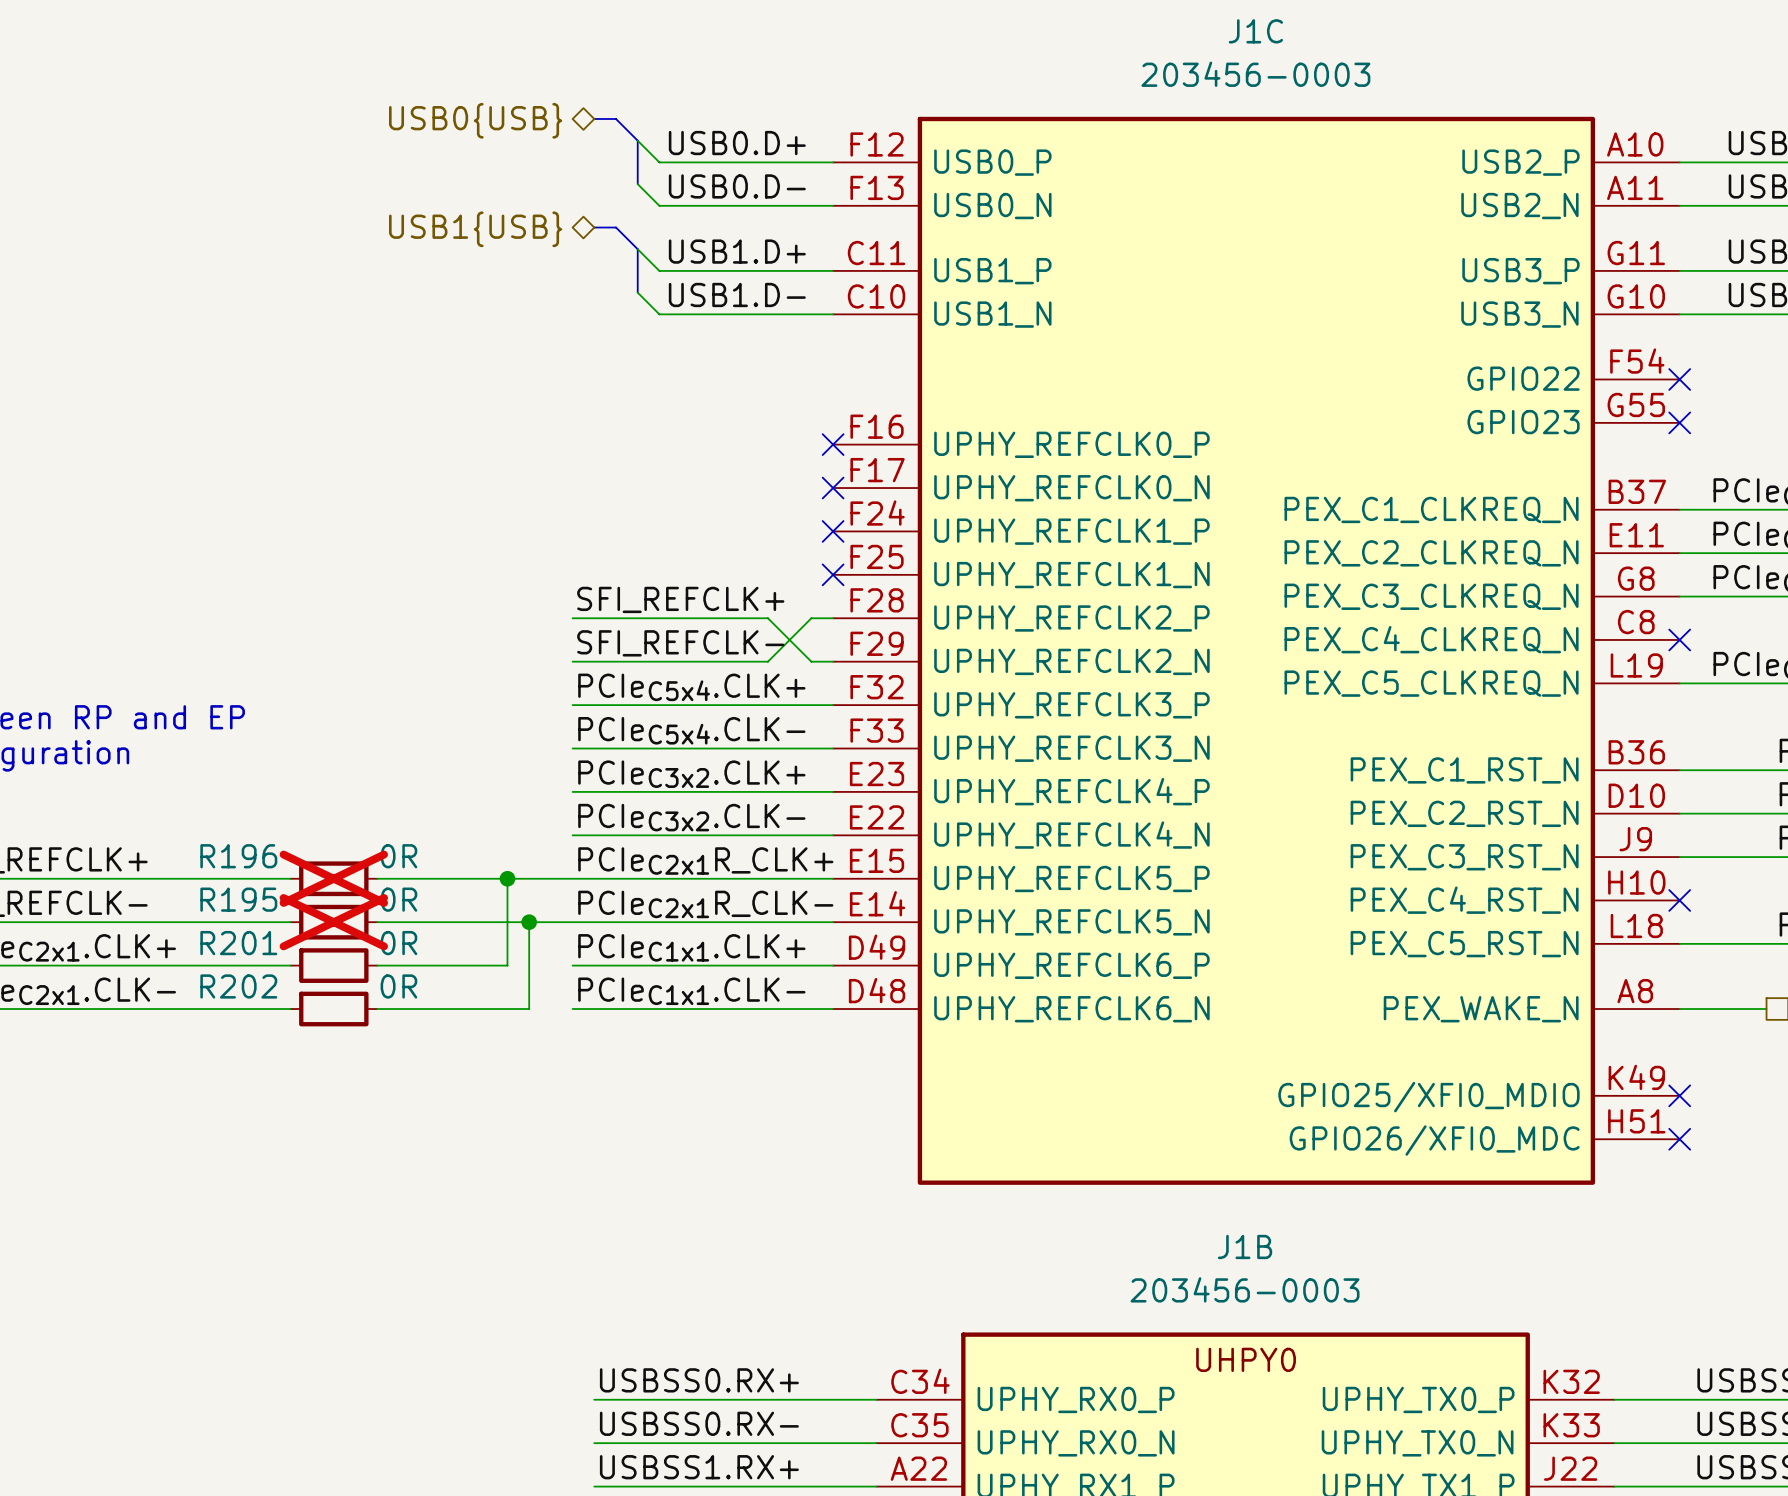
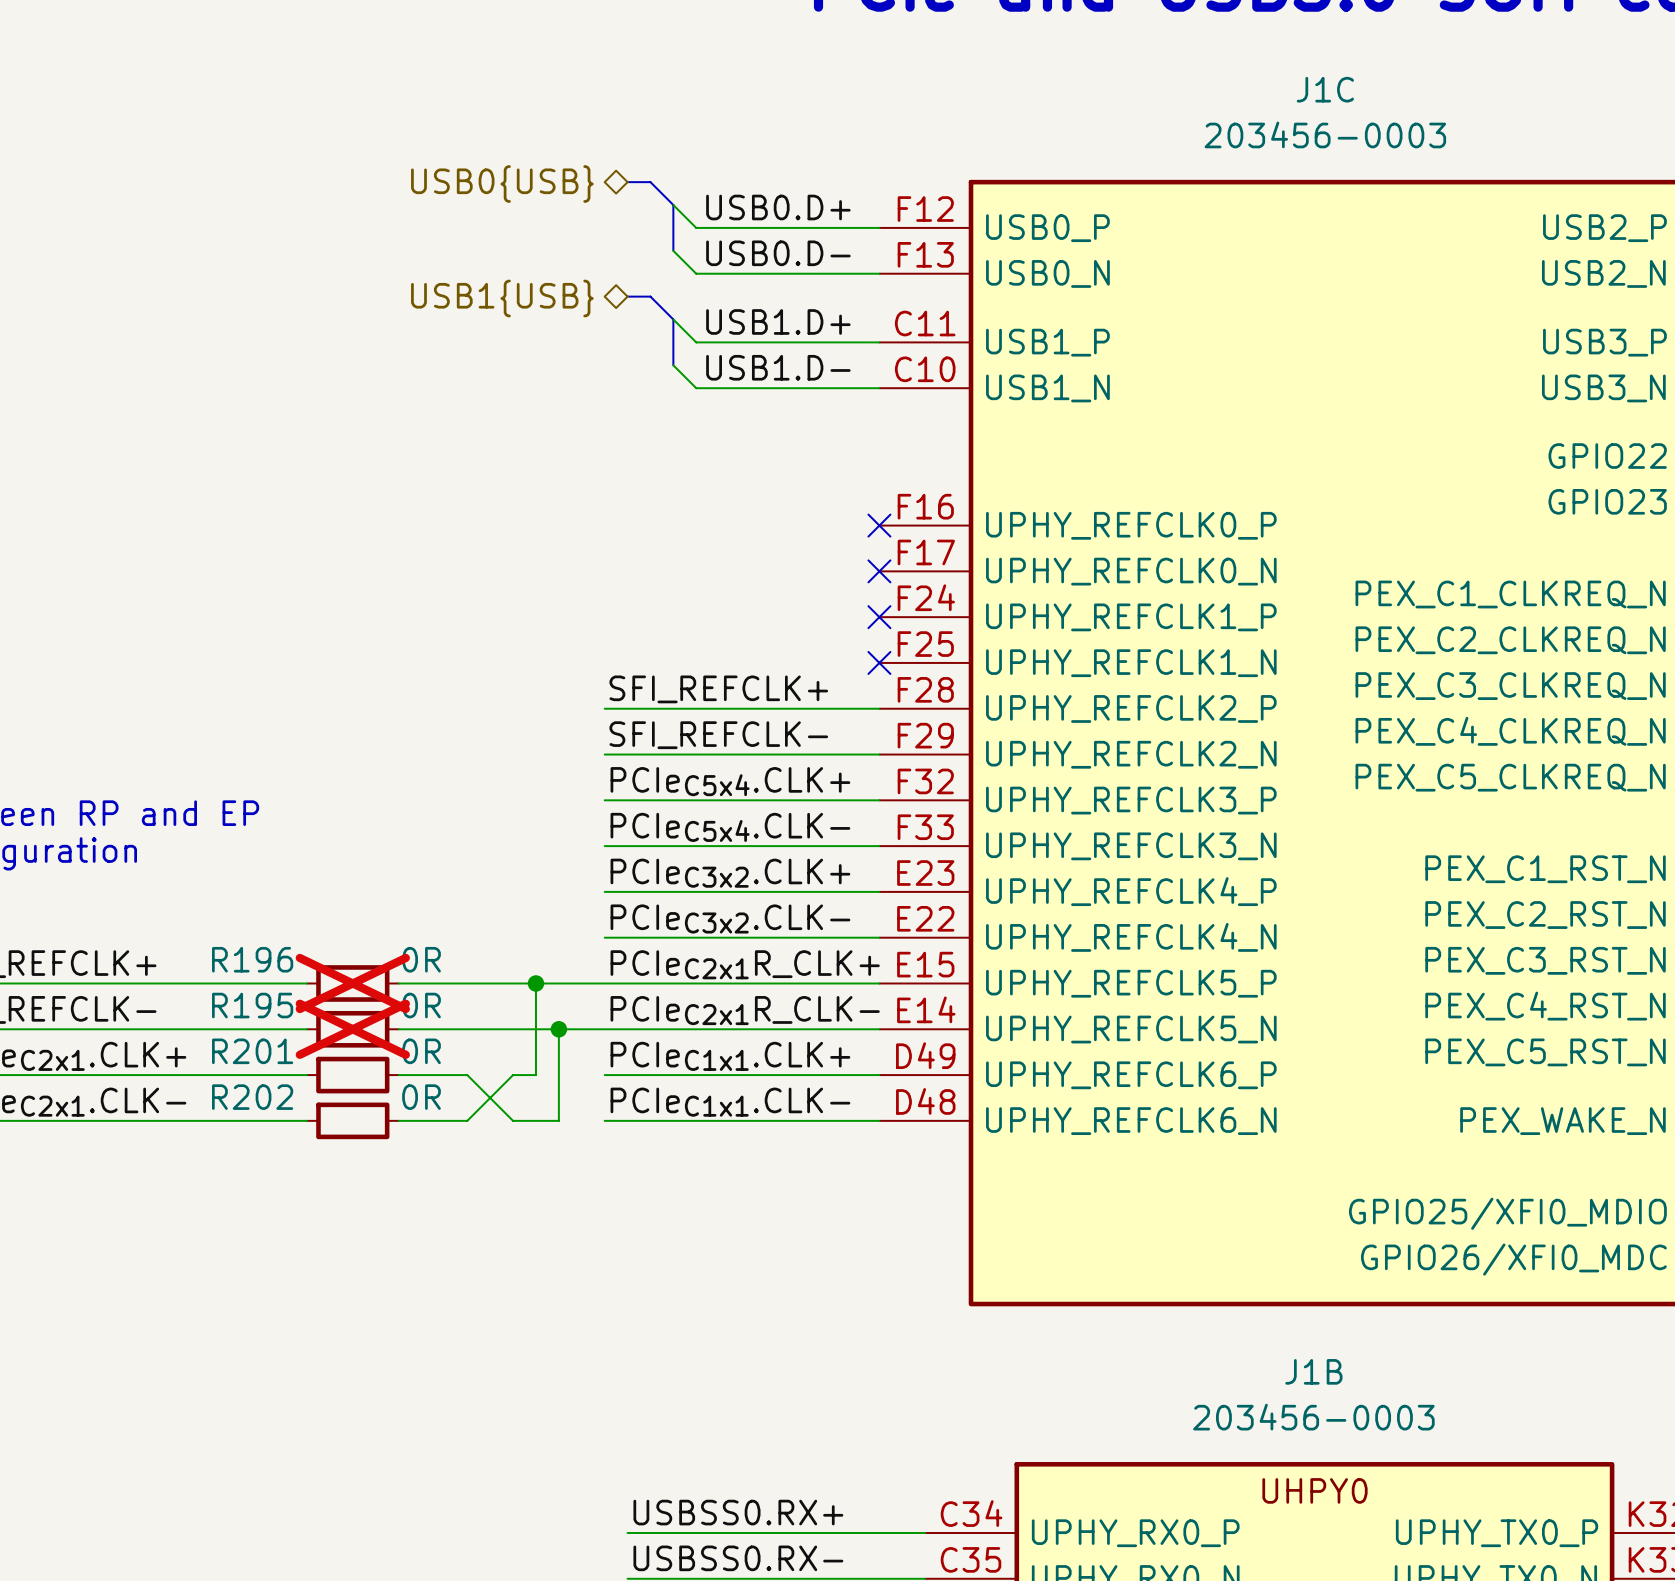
wire: (767, 618) (811, 661) -> (810, 708) (856, 708)
wire: (811, 618) (767, 661) -> (856, 754) (810, 754)
wire: (442, 965) (485, 965) -> (467, 1075) (513, 1120)
wire: (442, 1009) (485, 1009) -> (467, 1120) (513, 1075)

